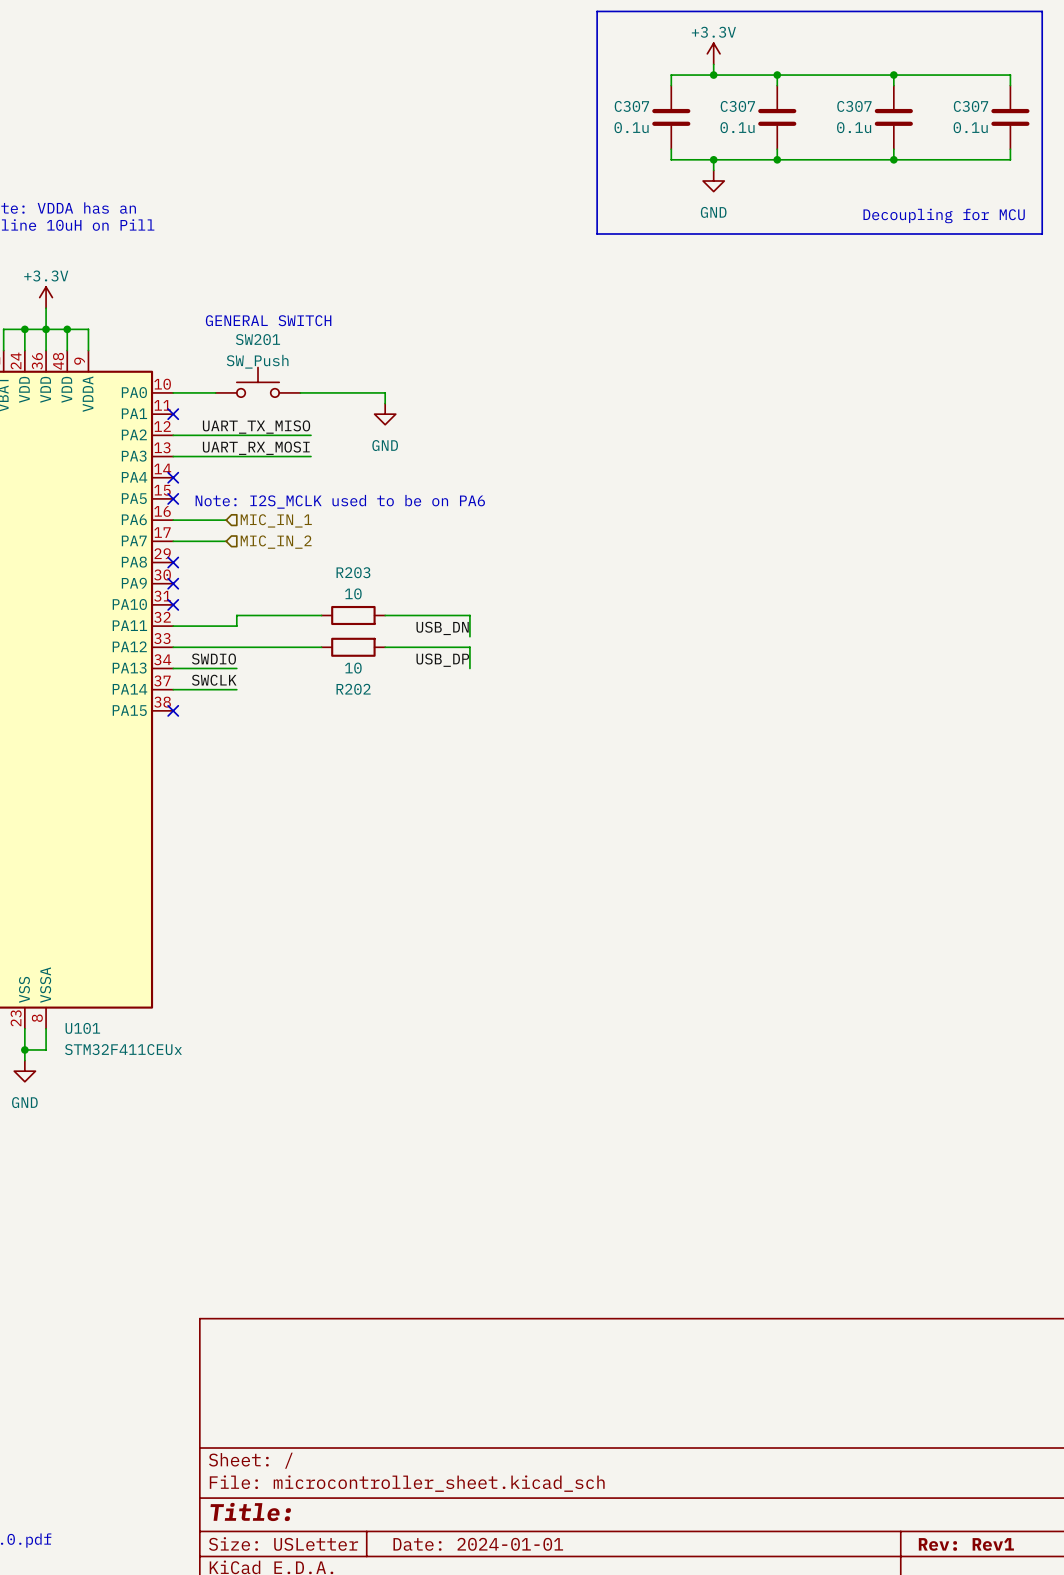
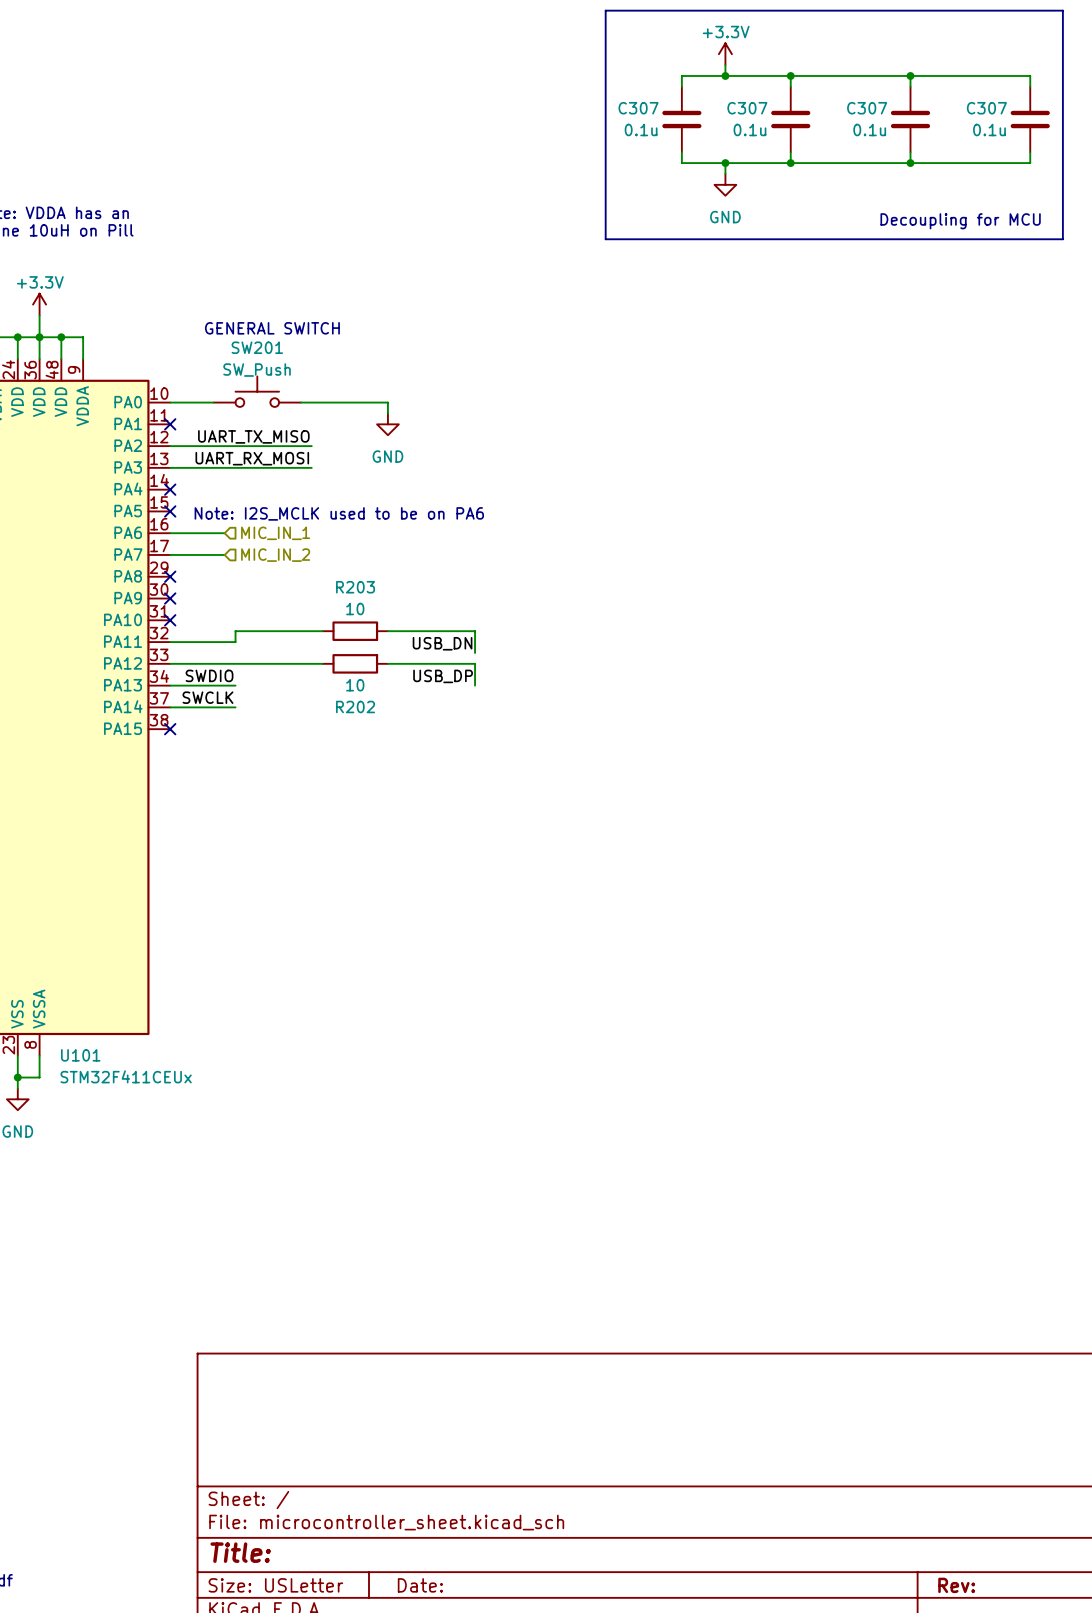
title block: Date: 2024-01-01 (478, 1544) -> Date: (420, 1585)
title block: Rev: Rev1 (966, 1544) -> Rev: (956, 1585)

